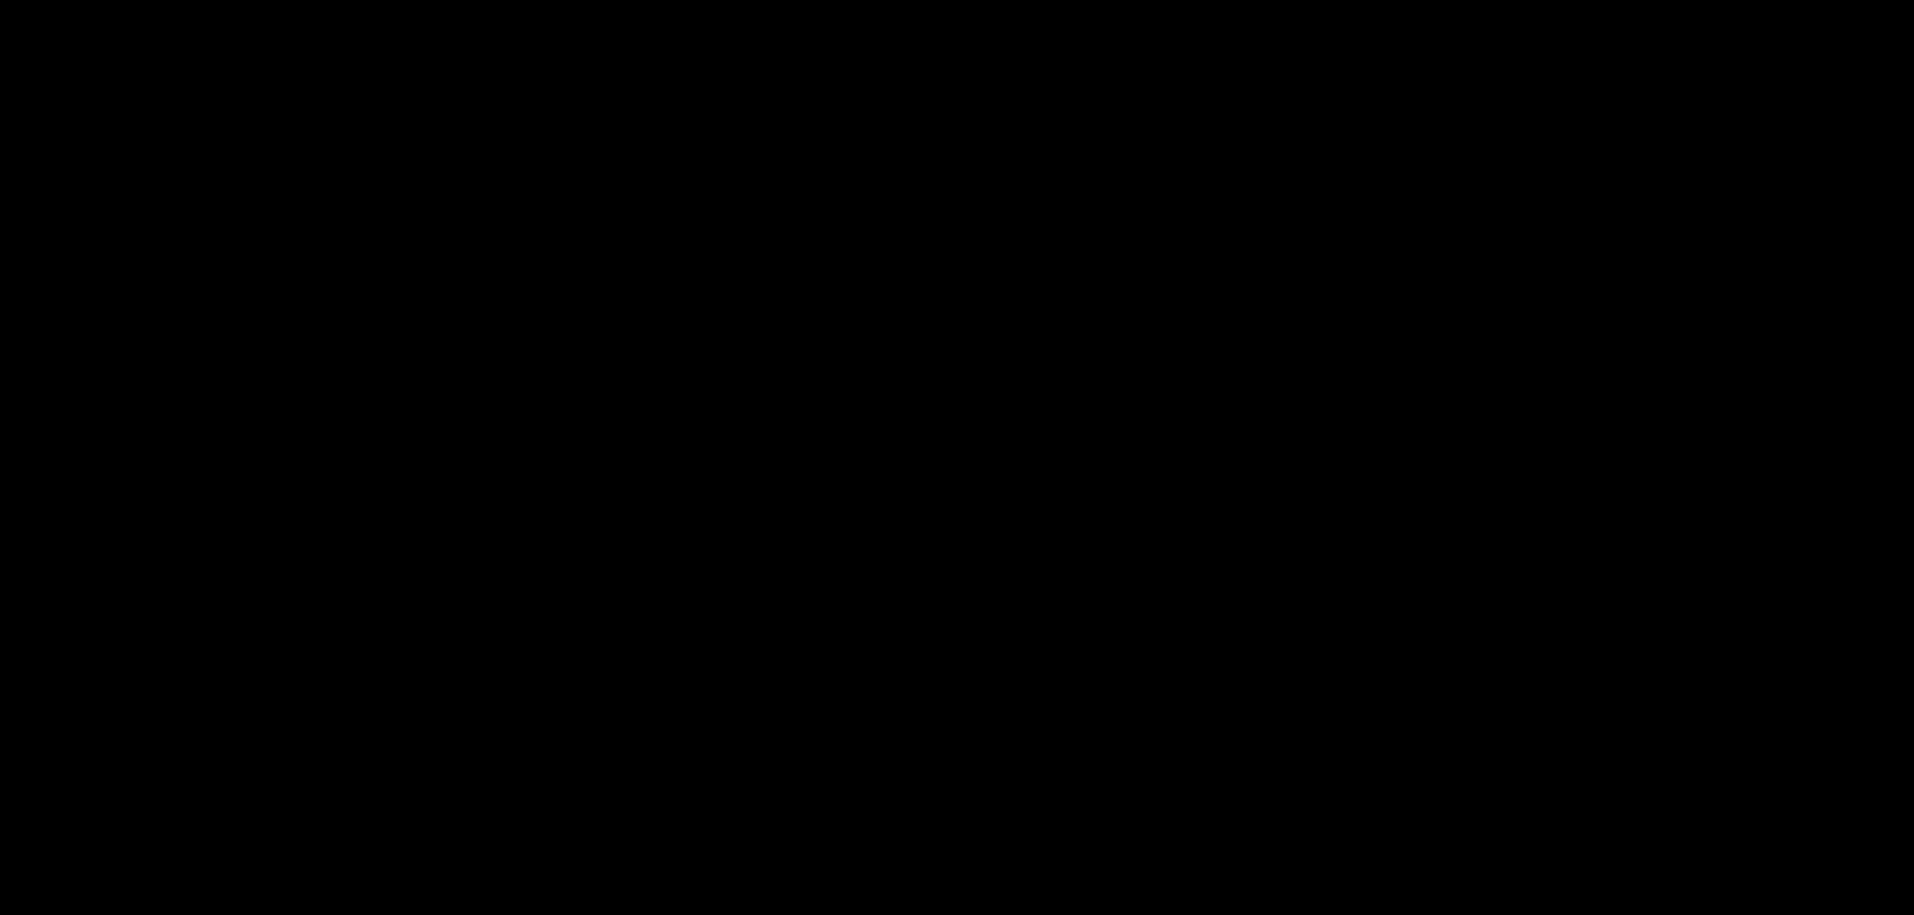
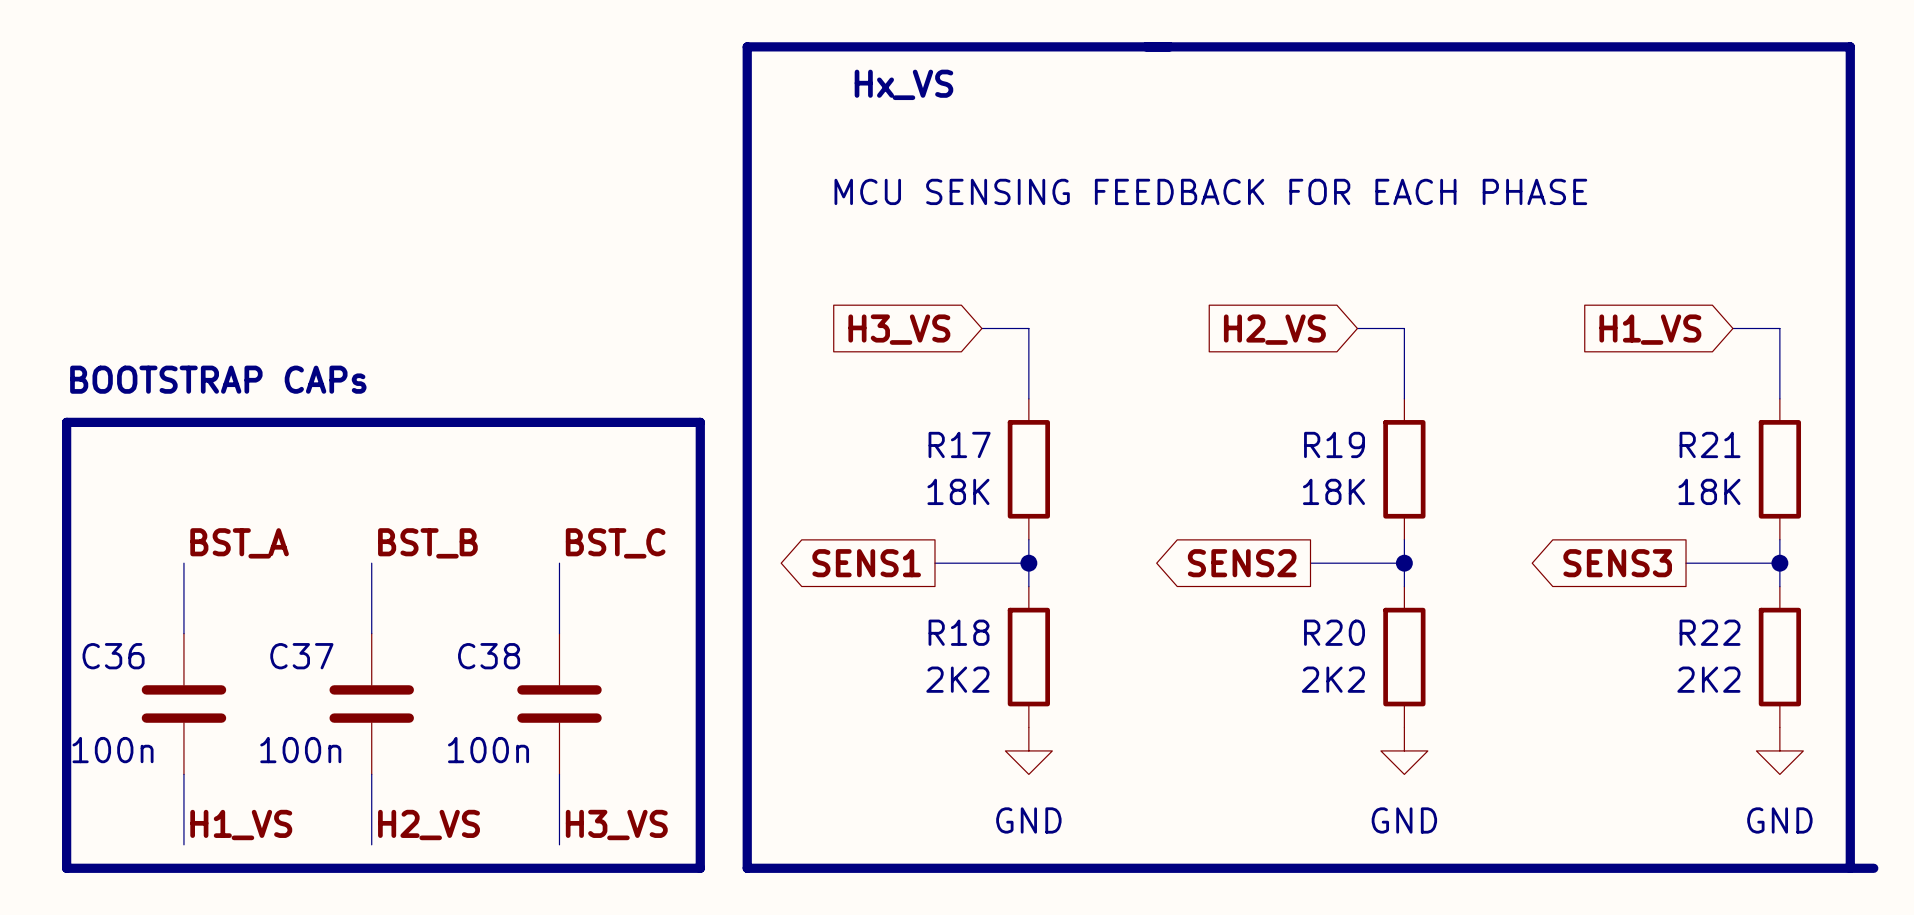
text: none -> Hx_VS (903, 84)
text: none -> MCU SENSING FEEDBACK FOR EACH PHASE (1210, 191)
wire: none -> (981, 328) (1028, 328) (1028, 398)
wire: none -> (1357, 328) (1404, 328) (1404, 398)
wire: none -> (1732, 328) (1779, 328) (1779, 398)
global label: none -> H3_VS (899, 329)
global label: none -> H2_VS (1274, 329)
global label: none -> H1_VS (1650, 329)
text: none -> BOOTSTRAP CAPs (218, 379)
line: none -> (66, 422) (700, 422) (700, 868) (66, 868) (66, 422)
R17: none -> 18K (1028, 469)
R19: none -> 18K (1404, 469)
R21: none -> 18K (1779, 469)
wire: none -> (1028, 539) (1028, 586)
wire: none -> (1404, 539) (1404, 586)
wire: none -> (1779, 539) (1779, 586)
label: none -> BST_A (239, 543)
label: none -> BST_B (427, 543)
label: none -> BST_C (615, 543)
wire: none -> (183, 563) (183, 633)
wire: none -> (371, 563) (371, 633)
wire: none -> (559, 563) (559, 633)
global label: none -> SENS1 (866, 563)
wire: none -> (934, 563) (1028, 563)
junction: none -> (1028, 563)
global label: none -> SENS2 (1242, 563)
wire: none -> (1310, 563) (1404, 563)
junction: none -> (1404, 563)
global label: none -> SENS3 (1617, 563)
wire: none -> (1686, 563) (1779, 563)
junction: none -> (1779, 563)
R18: none -> 2K2 (1028, 657)
R20: none -> 2K2 (1404, 657)
R22: none -> 2K2 (1779, 657)
C36: none -> 100n (183, 704)
C37: none -> 100n (371, 704)
C38: none -> 100n (559, 704)
power symbol: none -> GND (1028, 750)
power symbol: none -> GND (1404, 750)
power symbol: none -> GND (1779, 750)
wire: none -> (183, 774) (183, 844)
wire: none -> (371, 774) (371, 844)
wire: none -> (559, 774) (559, 844)
label: none -> H1_VS (241, 825)
label: none -> H2_VS (429, 825)
label: none -> H3_VS (616, 825)
line: none -> (1850, 868) (1850, 46) (747, 46) (747, 868) (1873, 868)

